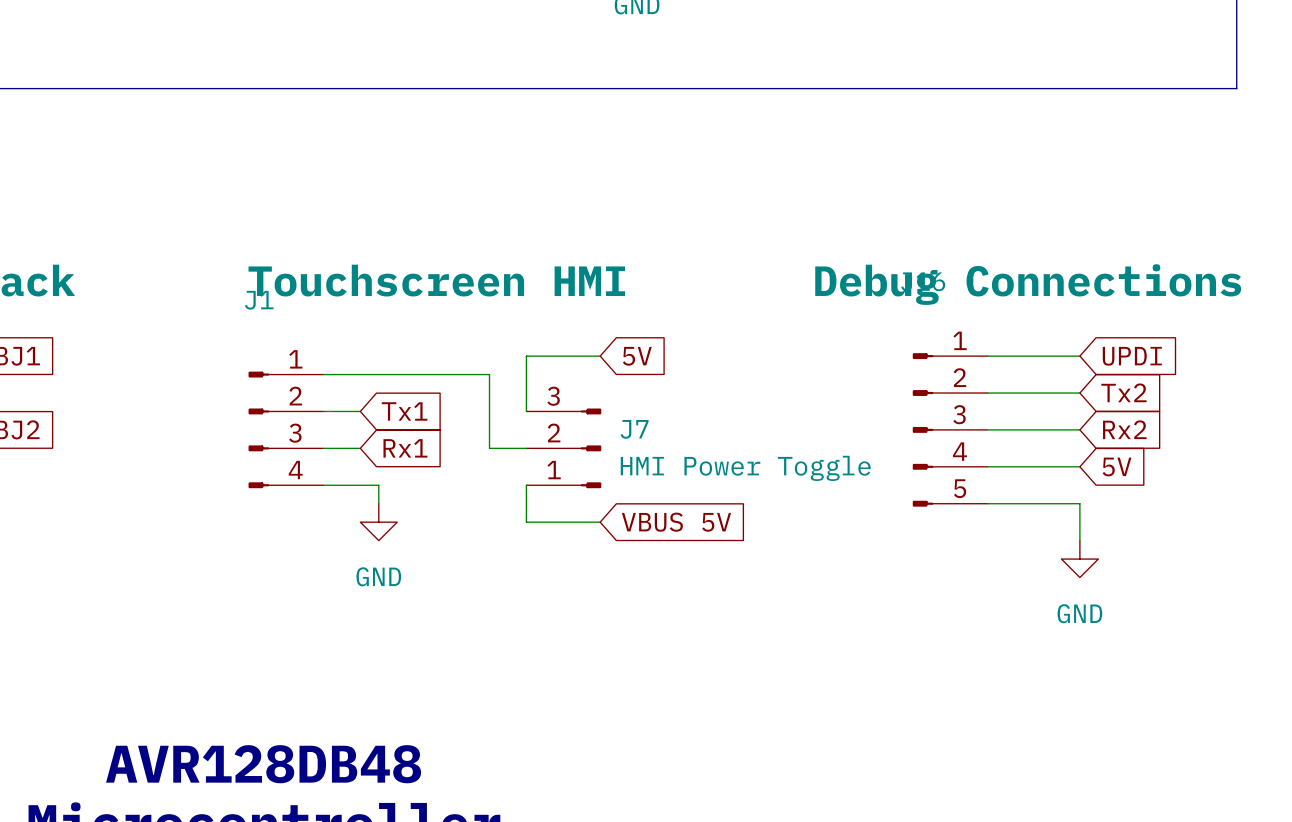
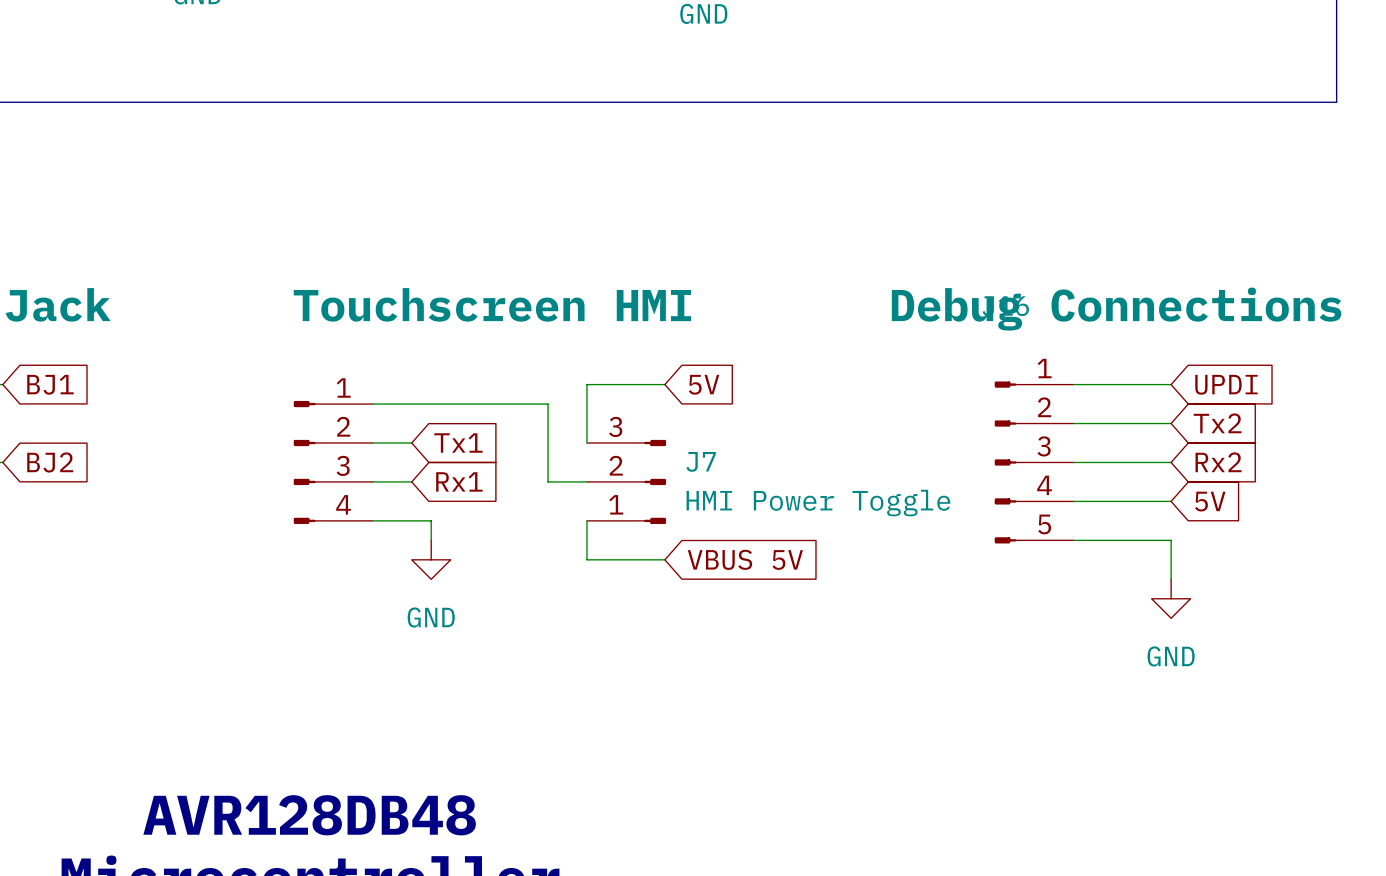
J1 name: J1 (259, 300) -> none

